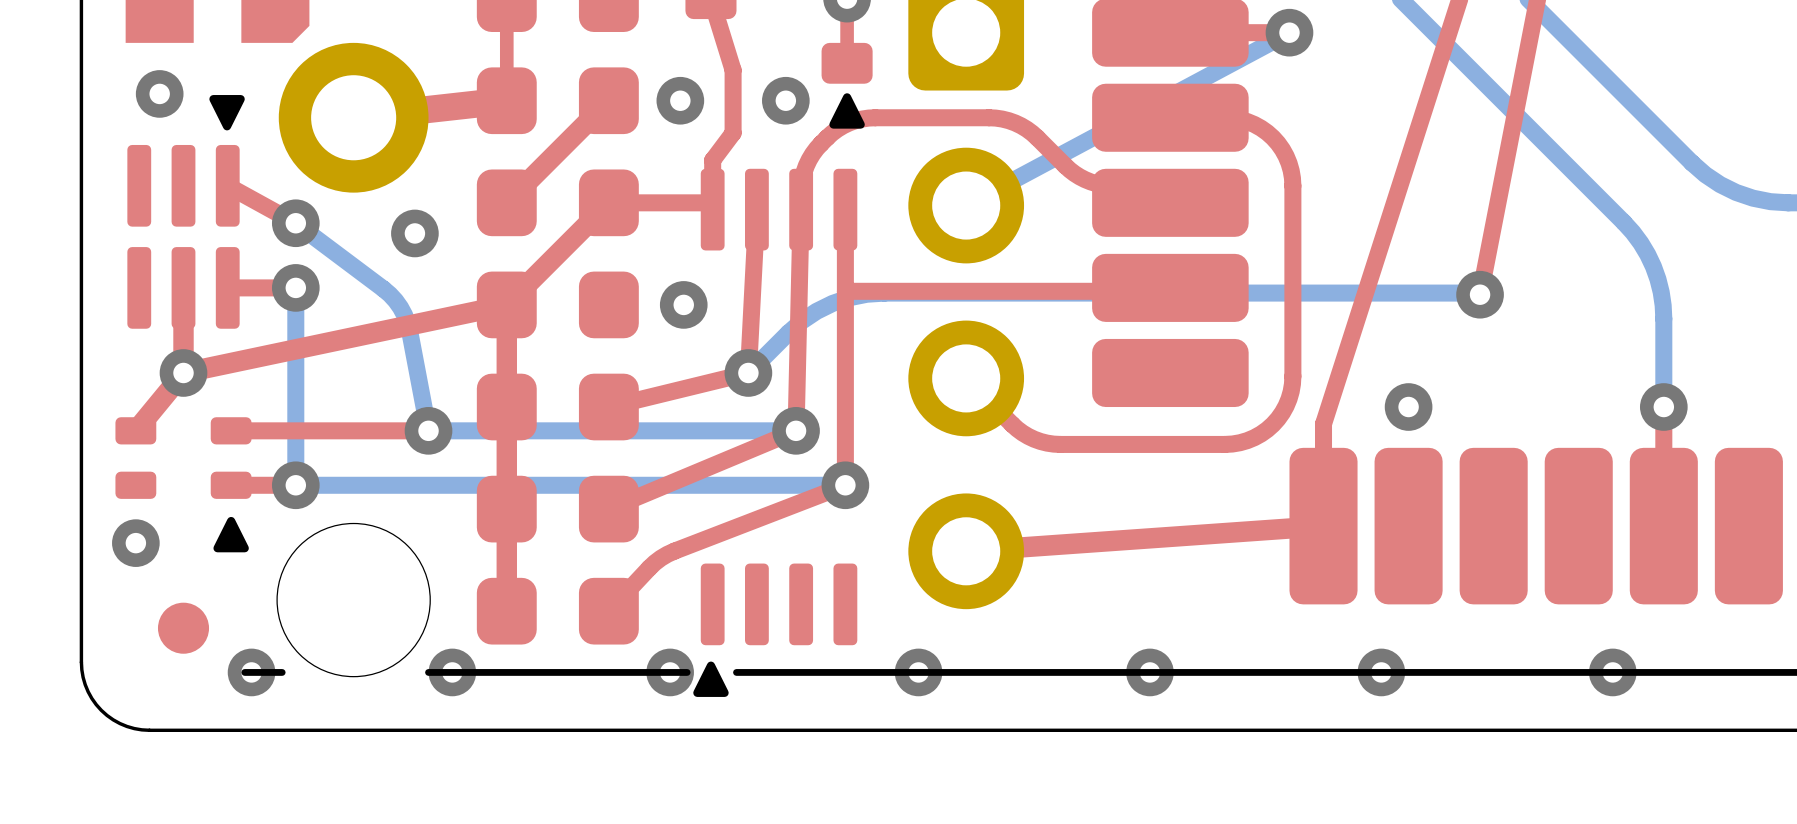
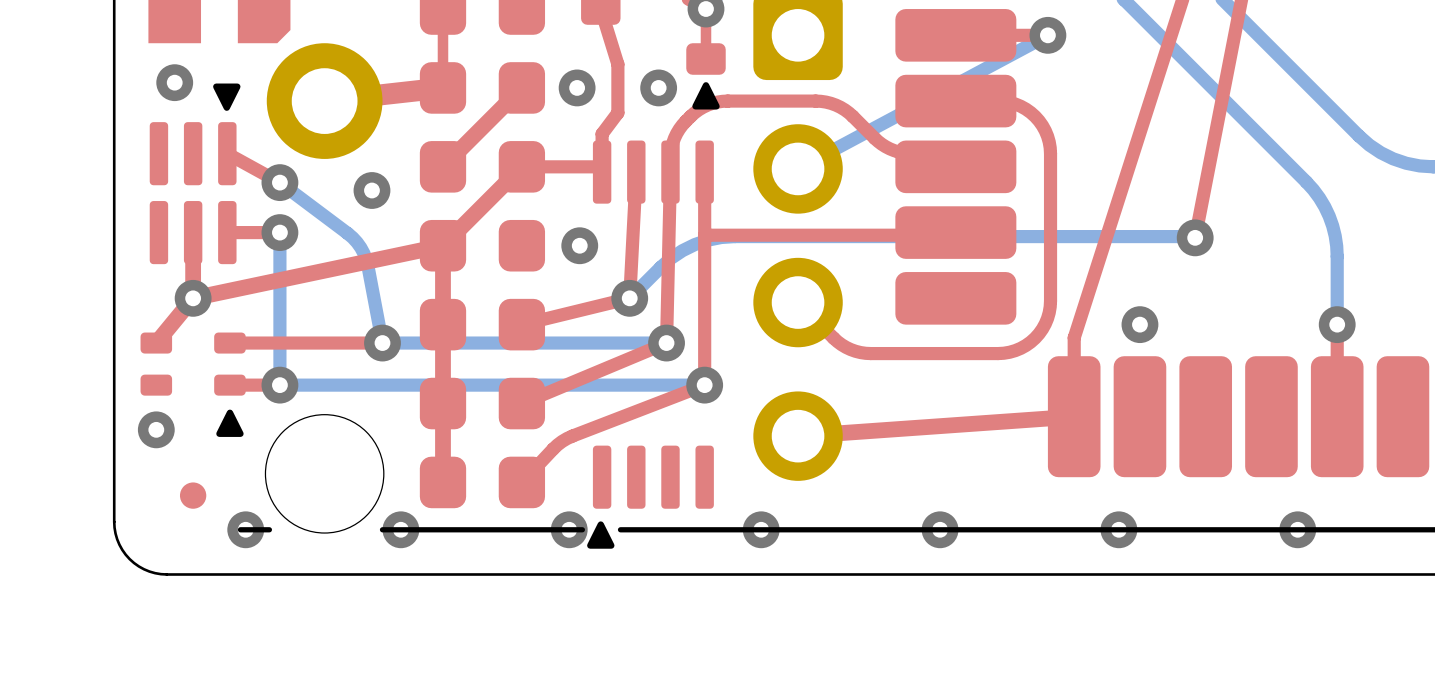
part footprint: [157, 602, 210, 654] -> [179, 482, 207, 509]

